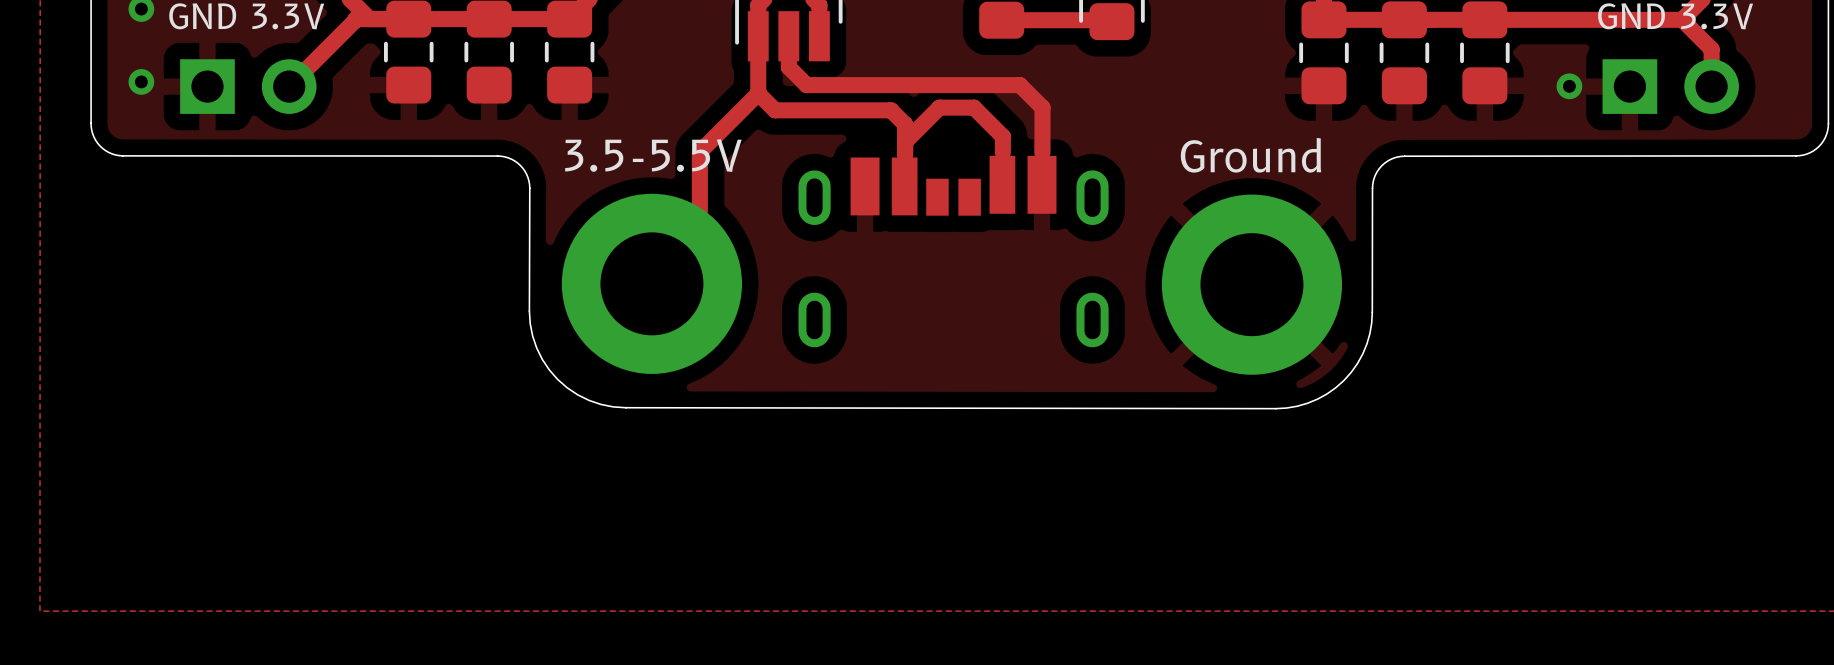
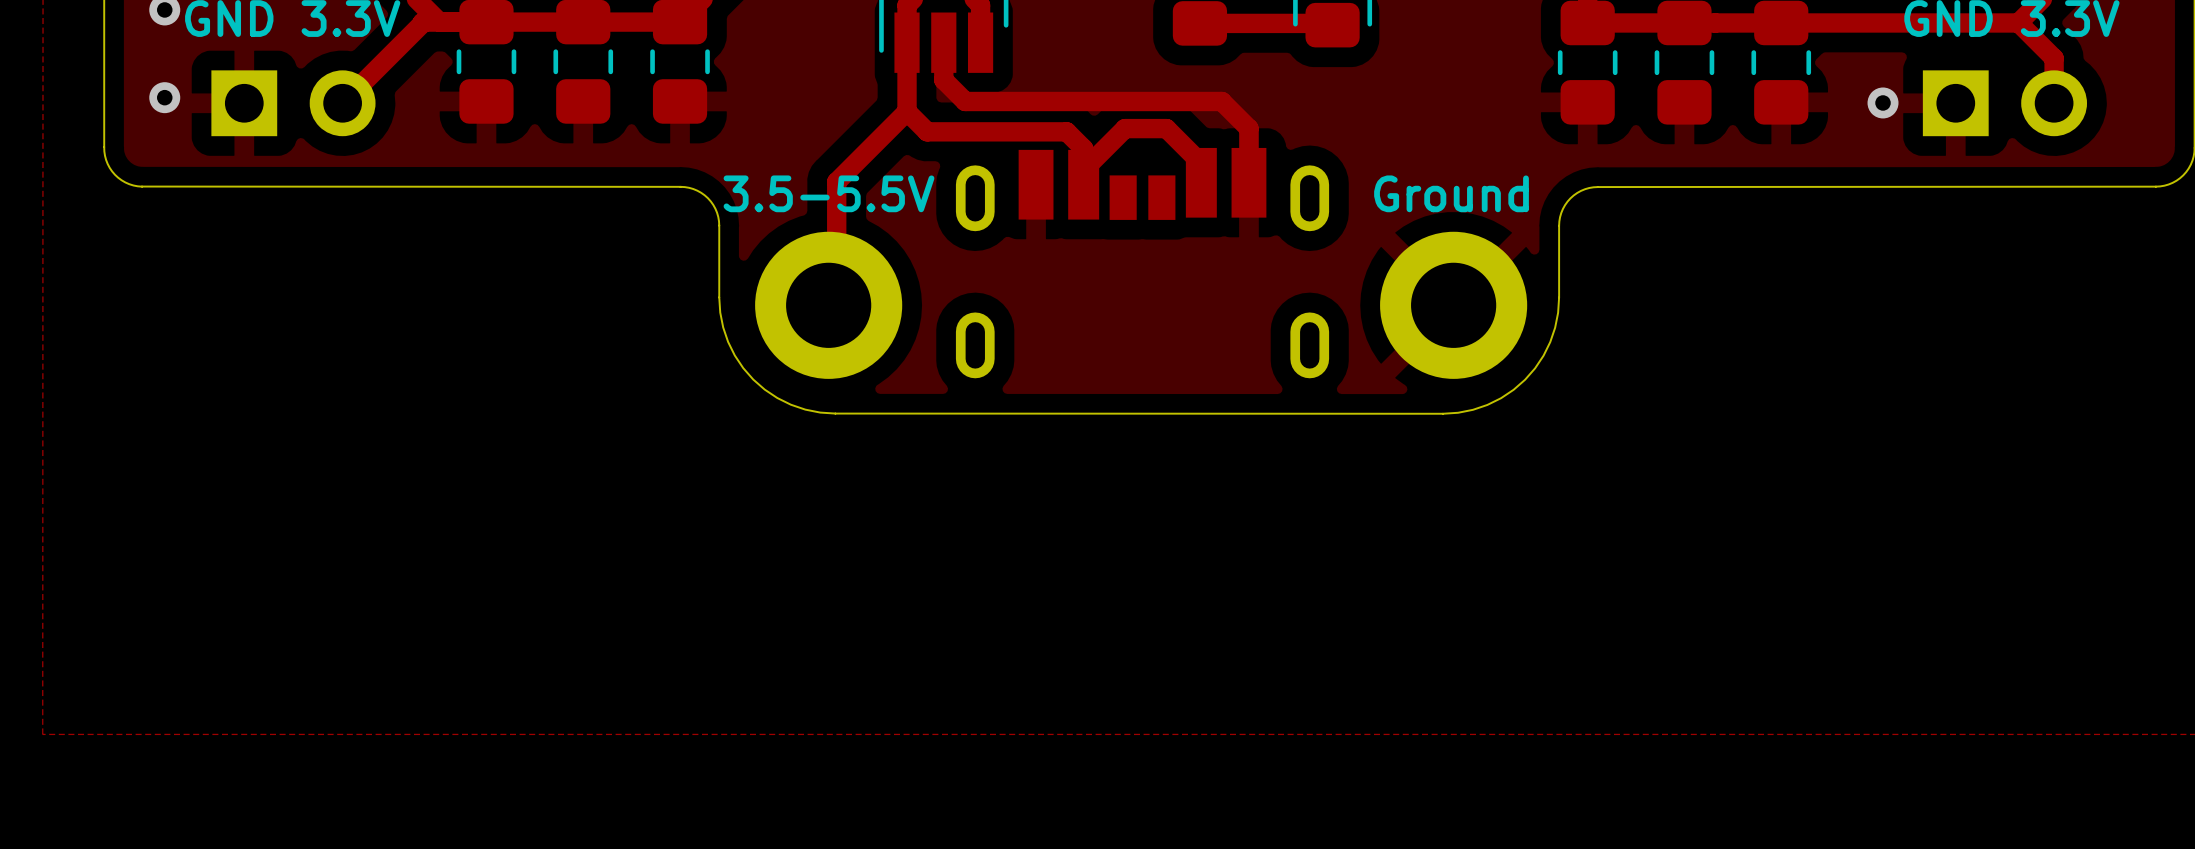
board edge: (122, 155) (497, 156) (511, 159) (522, 168) (529, 184) (529, 311) (532, 336) (536, 348) (549, 369) (567, 387) (577, 394) (600, 404) (625, 407) (1275, 408) (1307, 403) (1327, 393) (1351, 372) (1362, 354) (1371, 322) (1372, 184) (1379, 168) (1392, 158) (1404, 156) (1796, 155) -> (142, 186) (680, 186) (693, 189) (710, 201) (718, 216) (720, 312) (728, 341) (734, 355) (753, 379) (777, 398) (805, 409) (820, 412) (1442, 413) (1473, 409) (1501, 398) (1525, 379) (1543, 355) (1555, 327) (1558, 312) (1560, 217) (1567, 201) (1585, 189) (1597, 187) (2155, 186)
text: none -> Ground (1451, 193)
text: none -> 3.5-5.5V (829, 193)
part position: (953, 251) -> (1142, 263)
part: none -> (828, 305)
part: none -> (1453, 305)
part: 3.5-5.5V (651, 283) -> none
part: Ground (1251, 284) -> none

